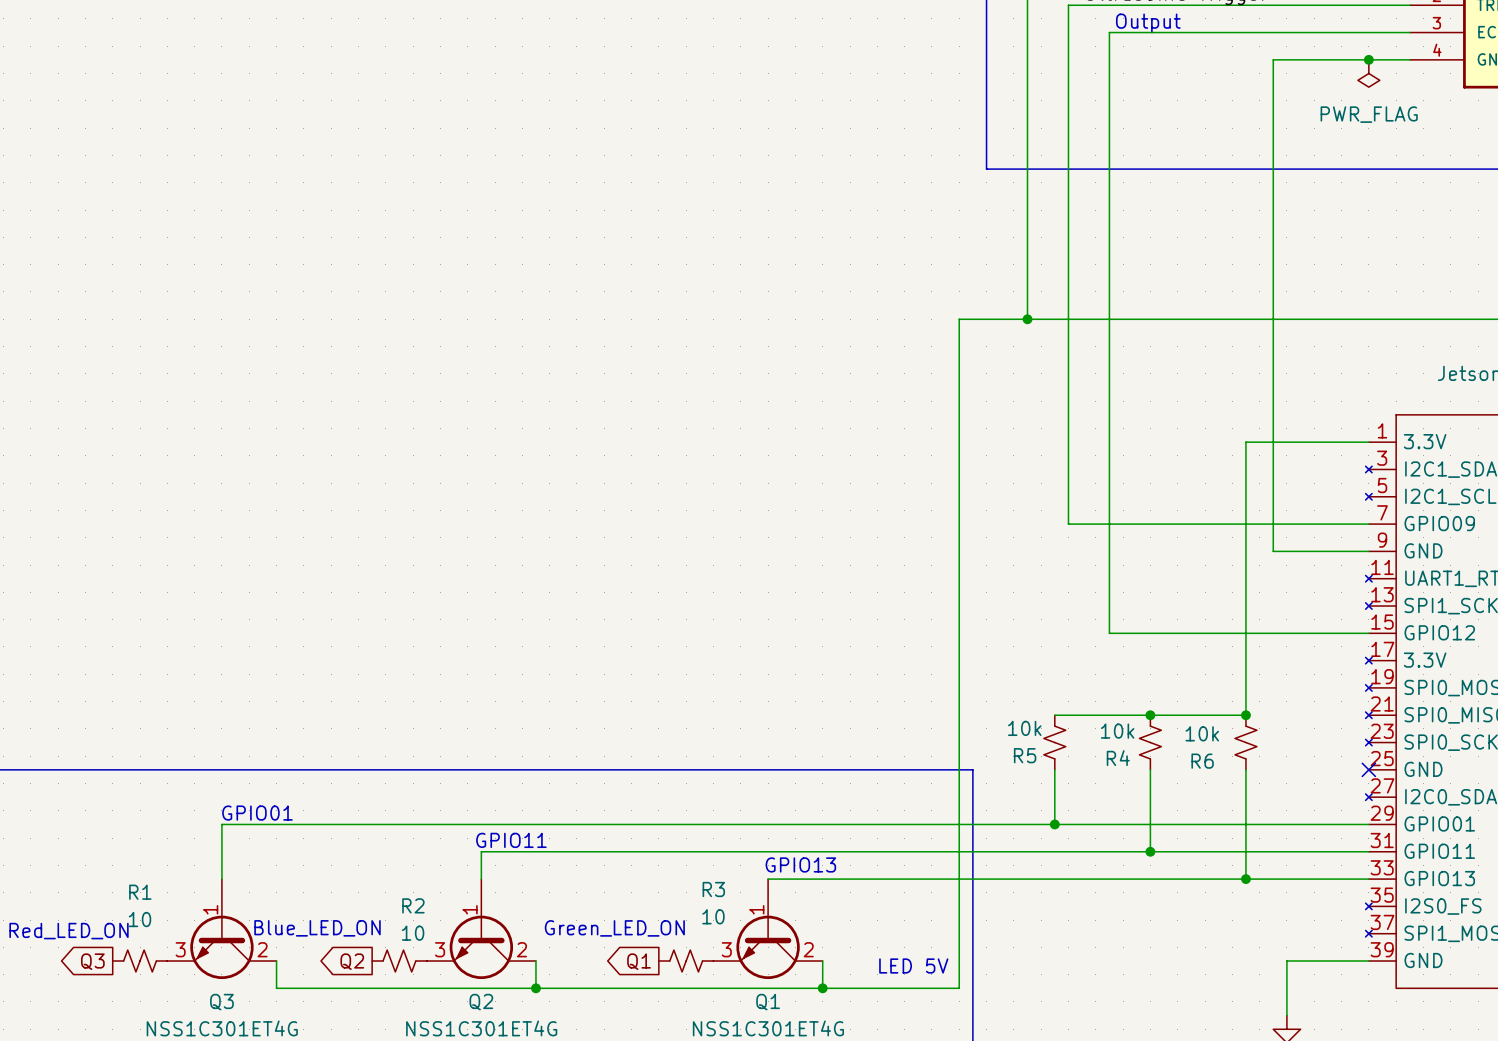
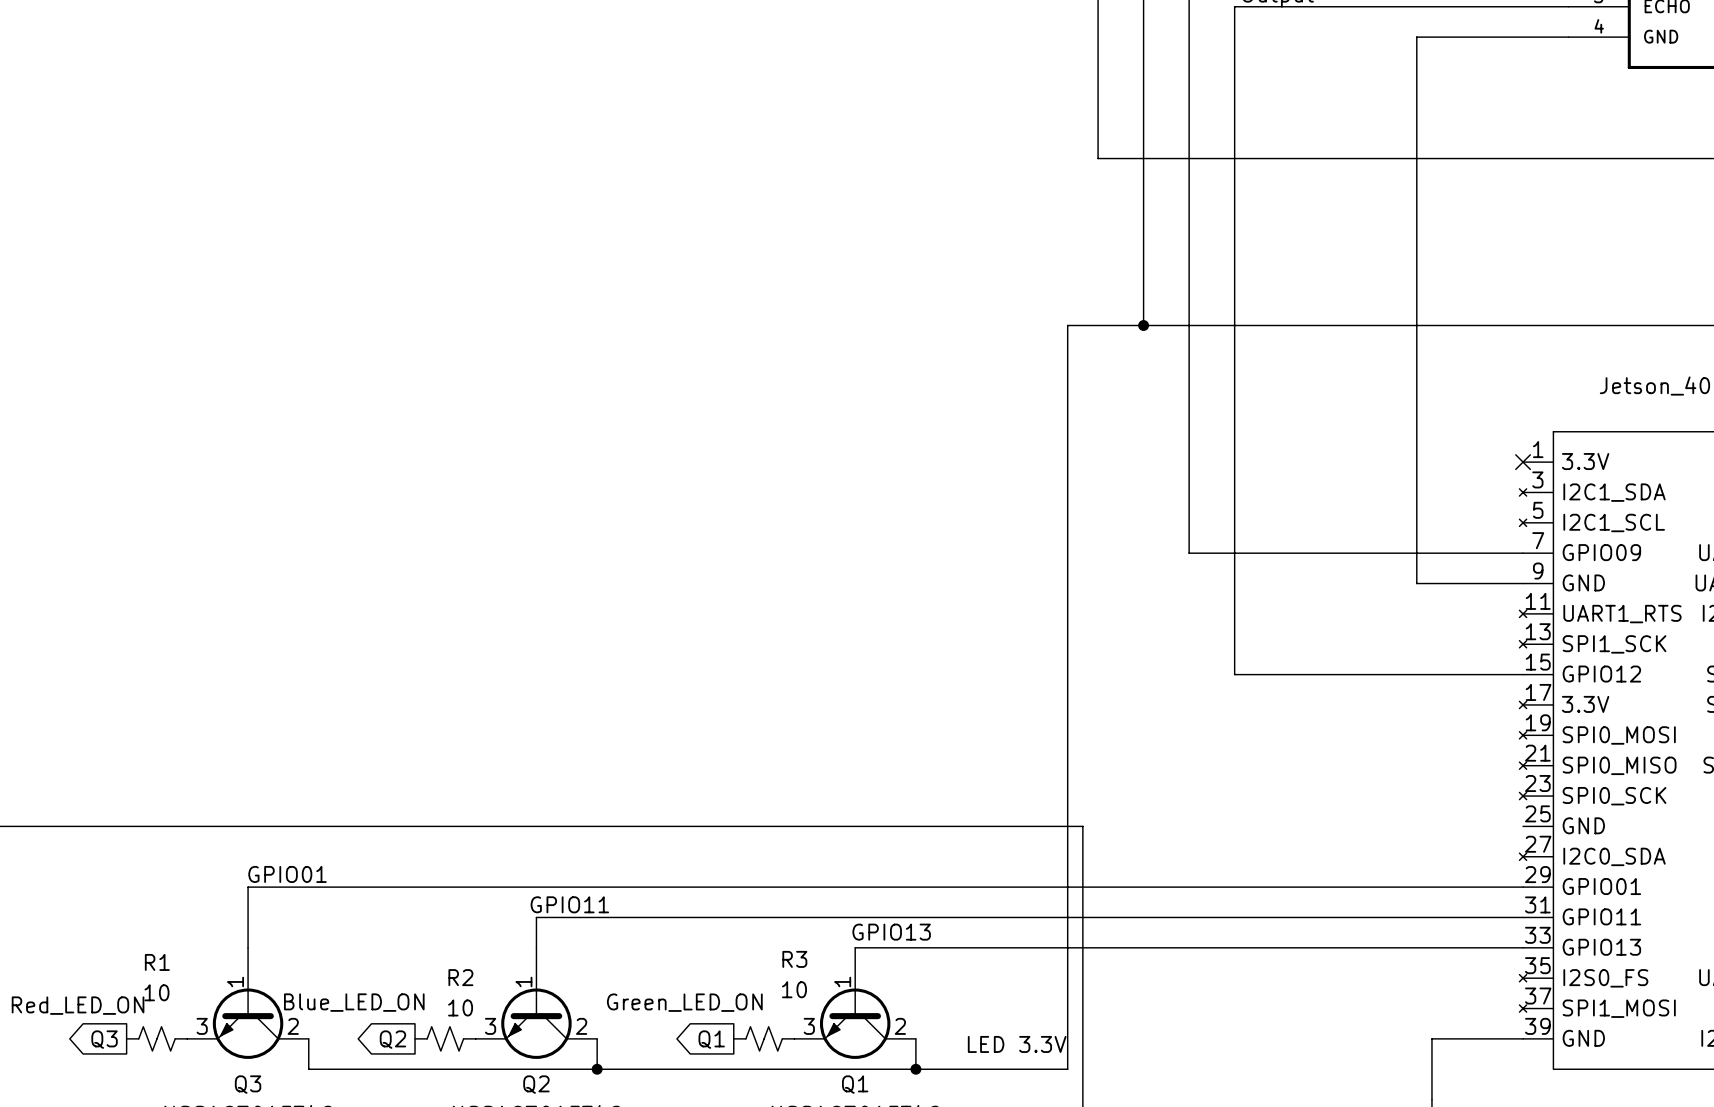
junction: (1368, 59) -> none
power symbol: PWR_FLAG (1368, 73) -> none
wire: (1368, 442) (1245, 442) (1245, 715) (1054, 715) -> none
no-connect mark: none -> (1523, 462)
junction: (1150, 715) -> none
junction: (1245, 715) -> none
R5: 10k (1054, 742) -> none
R4: 10k (1150, 742) -> none
R6: 10k (1245, 742) -> none
wire: (1054, 769) (1054, 824) -> none
wire: (1150, 769) (1150, 851) -> none
wire: (1245, 769) (1245, 879) -> none
no-connect mark: (1368, 769) -> none
junction: (1054, 824) -> none
junction: (1150, 851) -> none
junction: (1245, 879) -> none
text: LED 5V (913, 966) -> LED 3.3V (1017, 1044)

